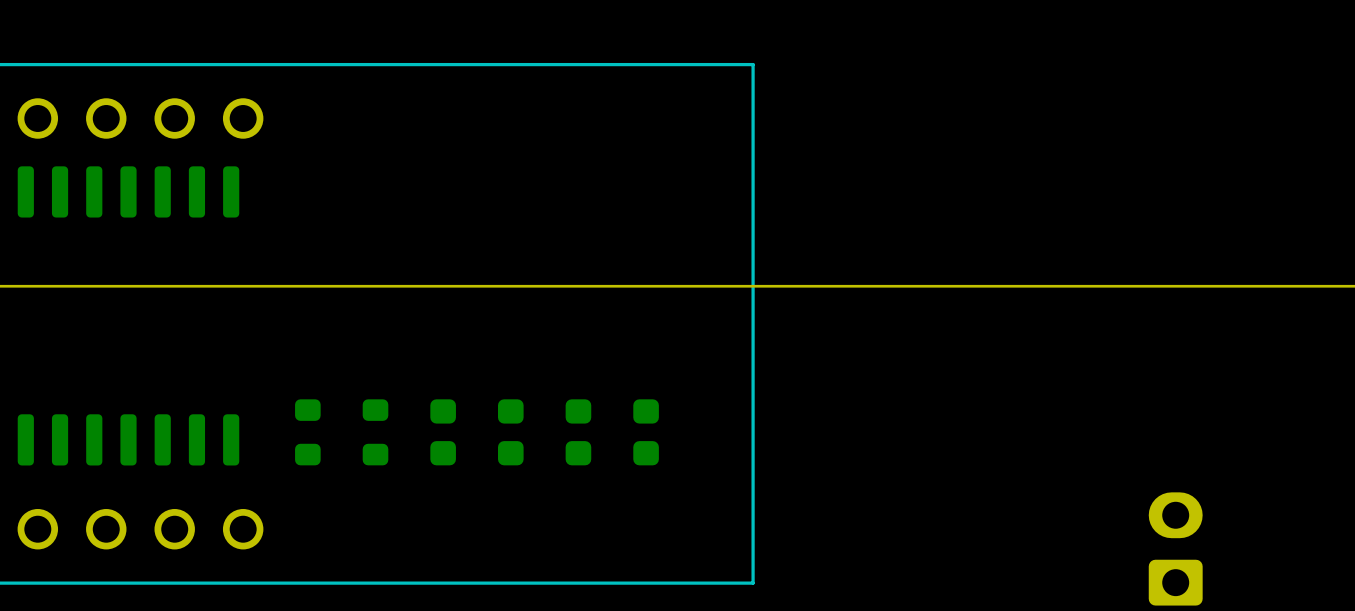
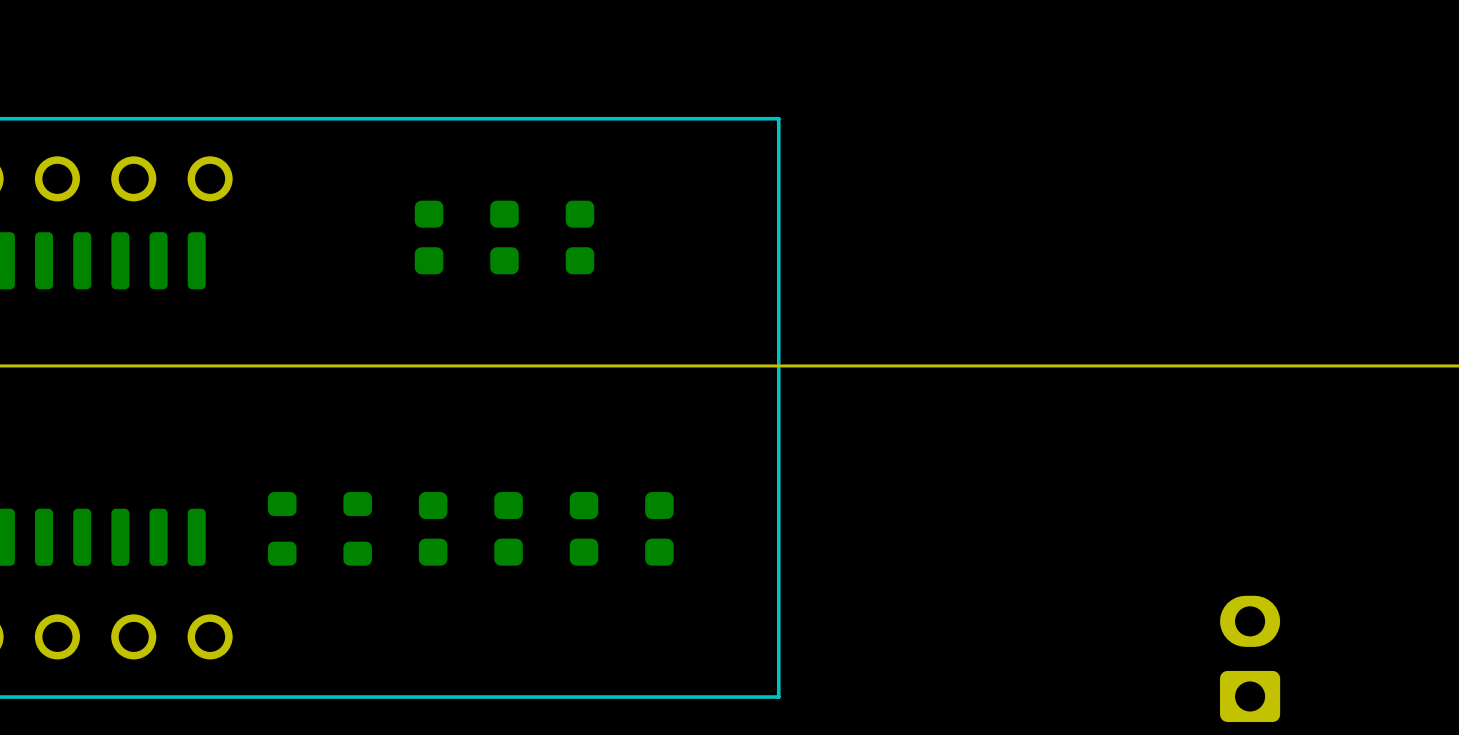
part: none -> (429, 237)
part: none -> (504, 237)
part: none -> (579, 237)

